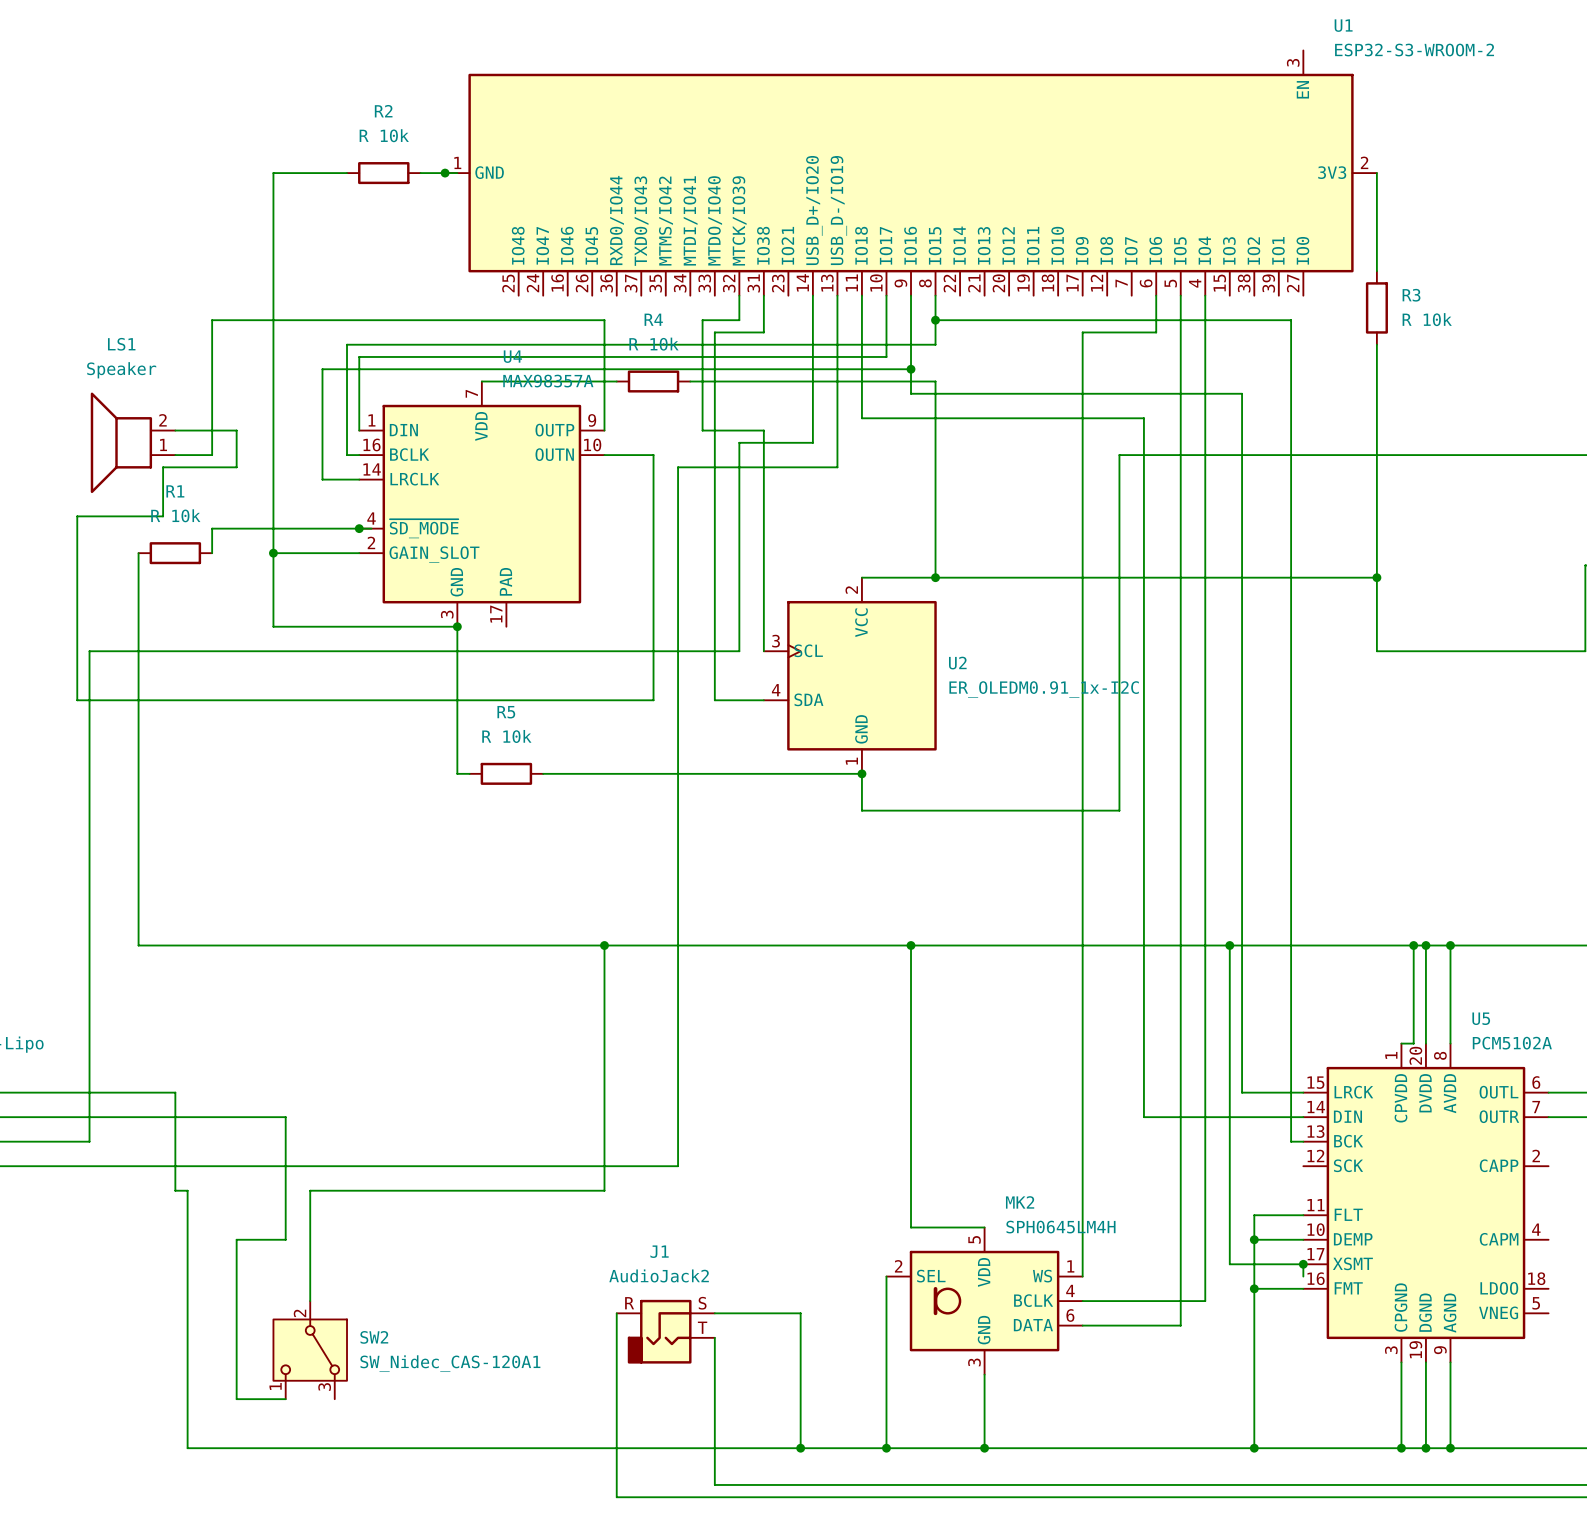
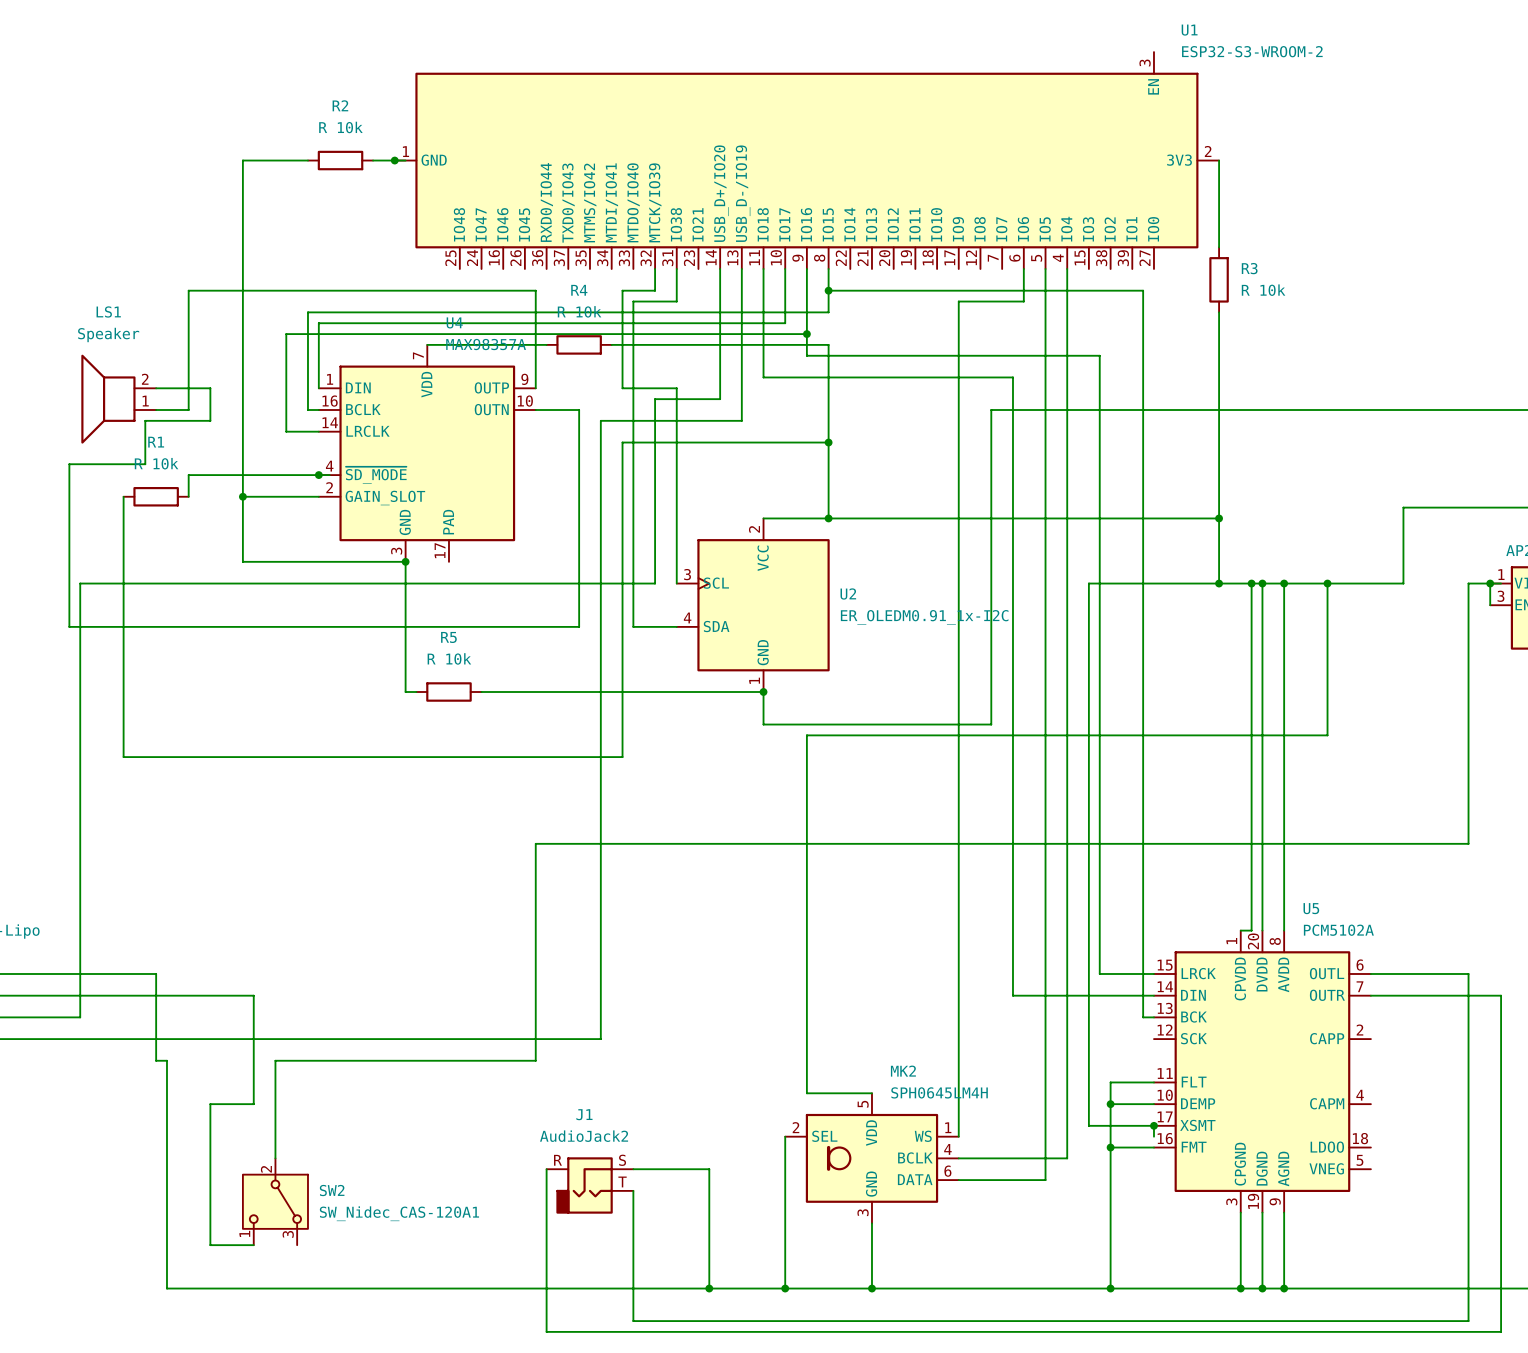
junction: none -> (828, 442)
wire: none -> (1219, 583) (1088, 583) (1088, 843)
junction: none -> (1219, 583)
wire: none -> (1251, 583) (1251, 843)
junction: none -> (1251, 583)
wire: none -> (1262, 583) (1262, 843)
junction: none -> (1262, 583)
wire: none -> (1284, 583) (1284, 843)
junction: none -> (1284, 583)
wire: none -> (1327, 583) (1327, 735) (806, 735) (806, 843)
junction: none -> (1327, 583)
wire: (138, 847) (138, 945) (604, 945) -> (123, 757) (622, 757) (622, 442) (828, 442)
junction: (604, 945) -> none
junction: (911, 945) -> none
junction: (1229, 945) -> none
junction: (1413, 945) -> none
junction: (1425, 945) -> none
junction: (1450, 945) -> none

